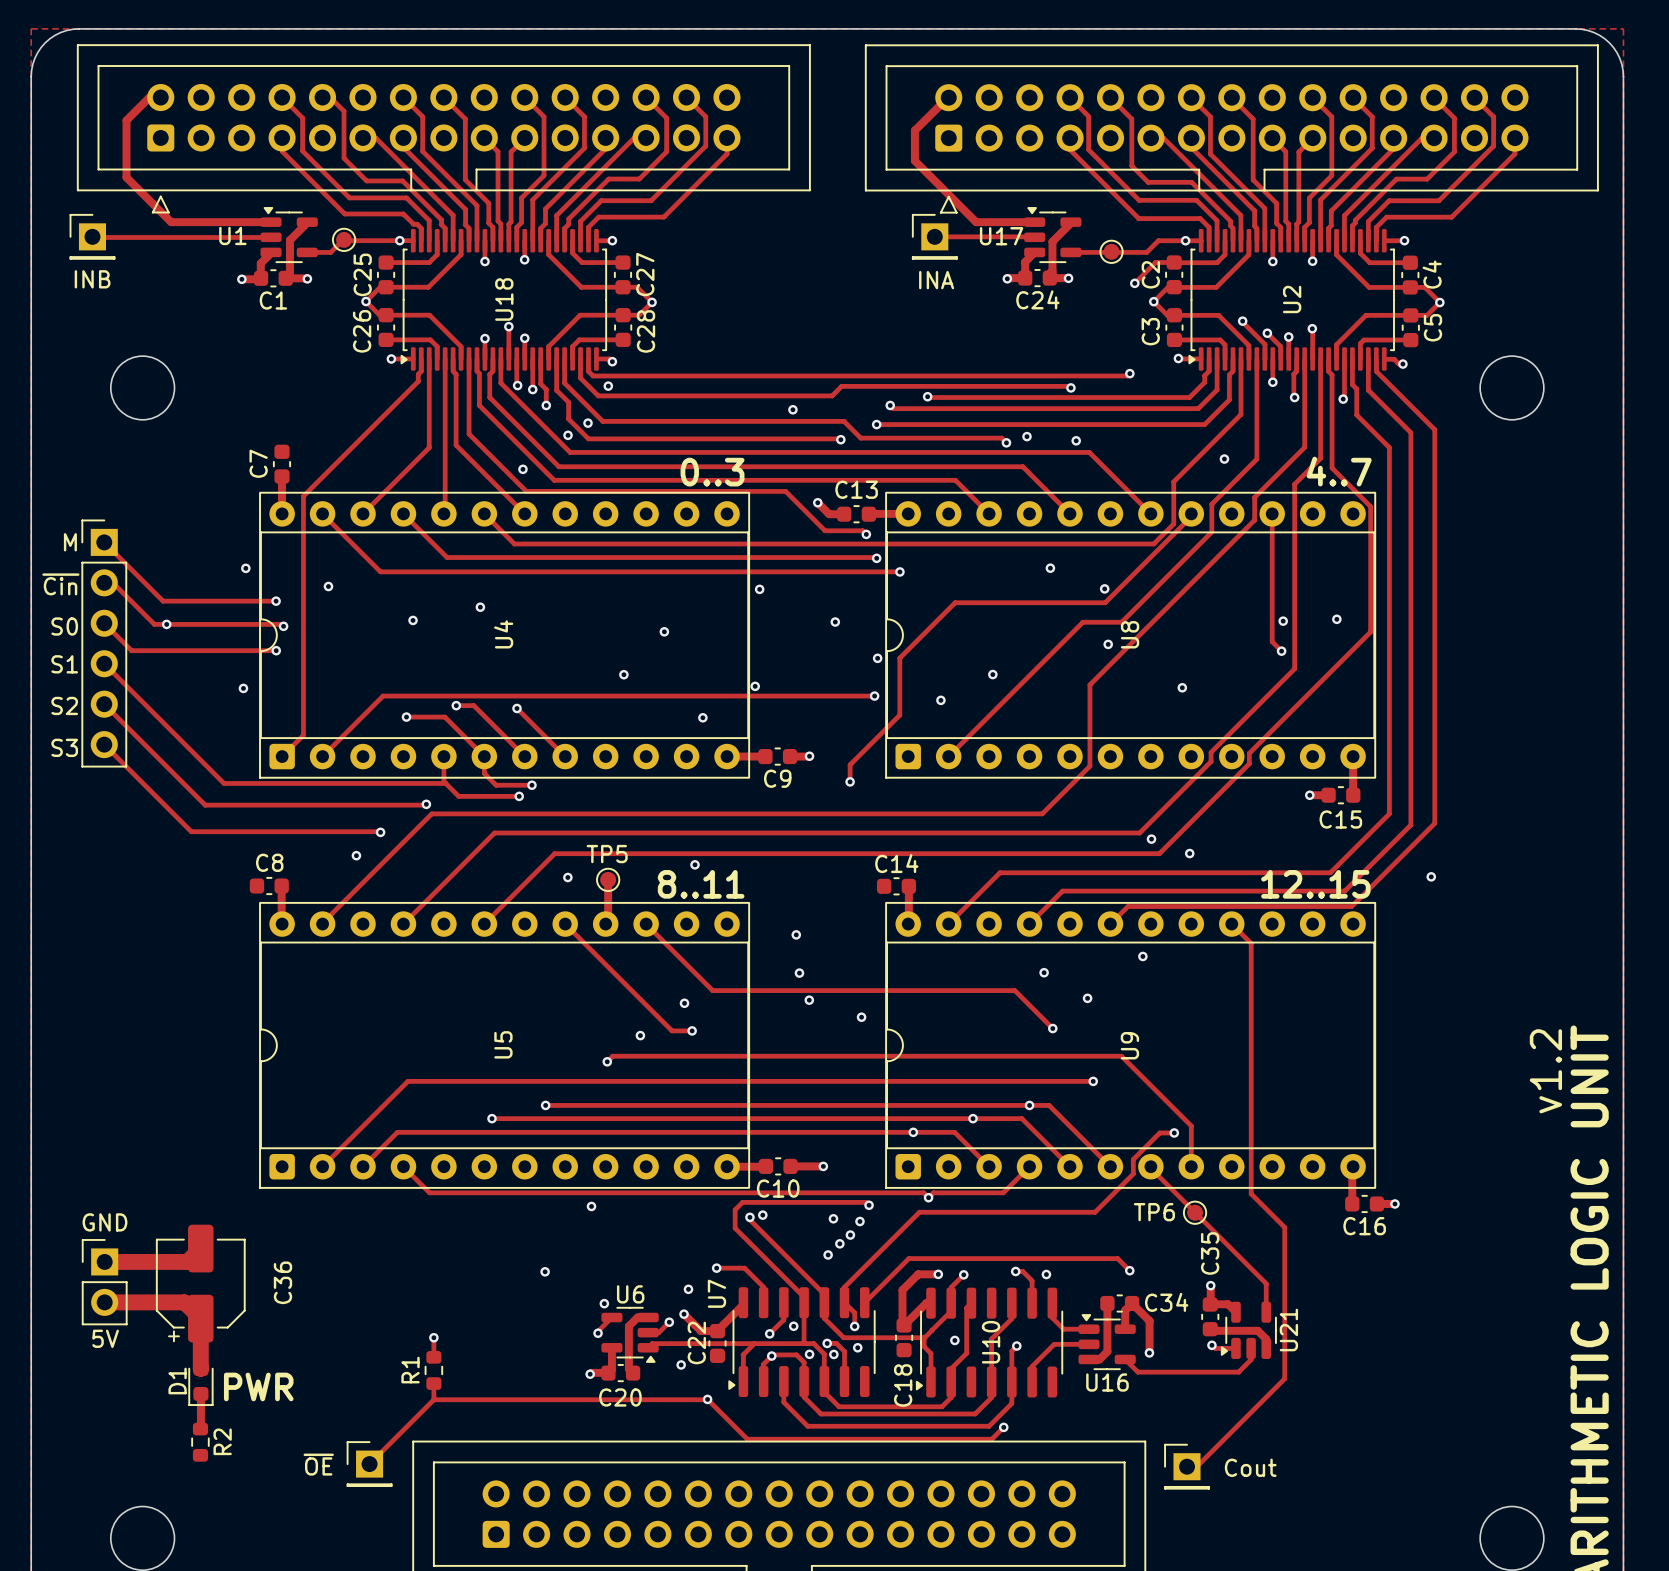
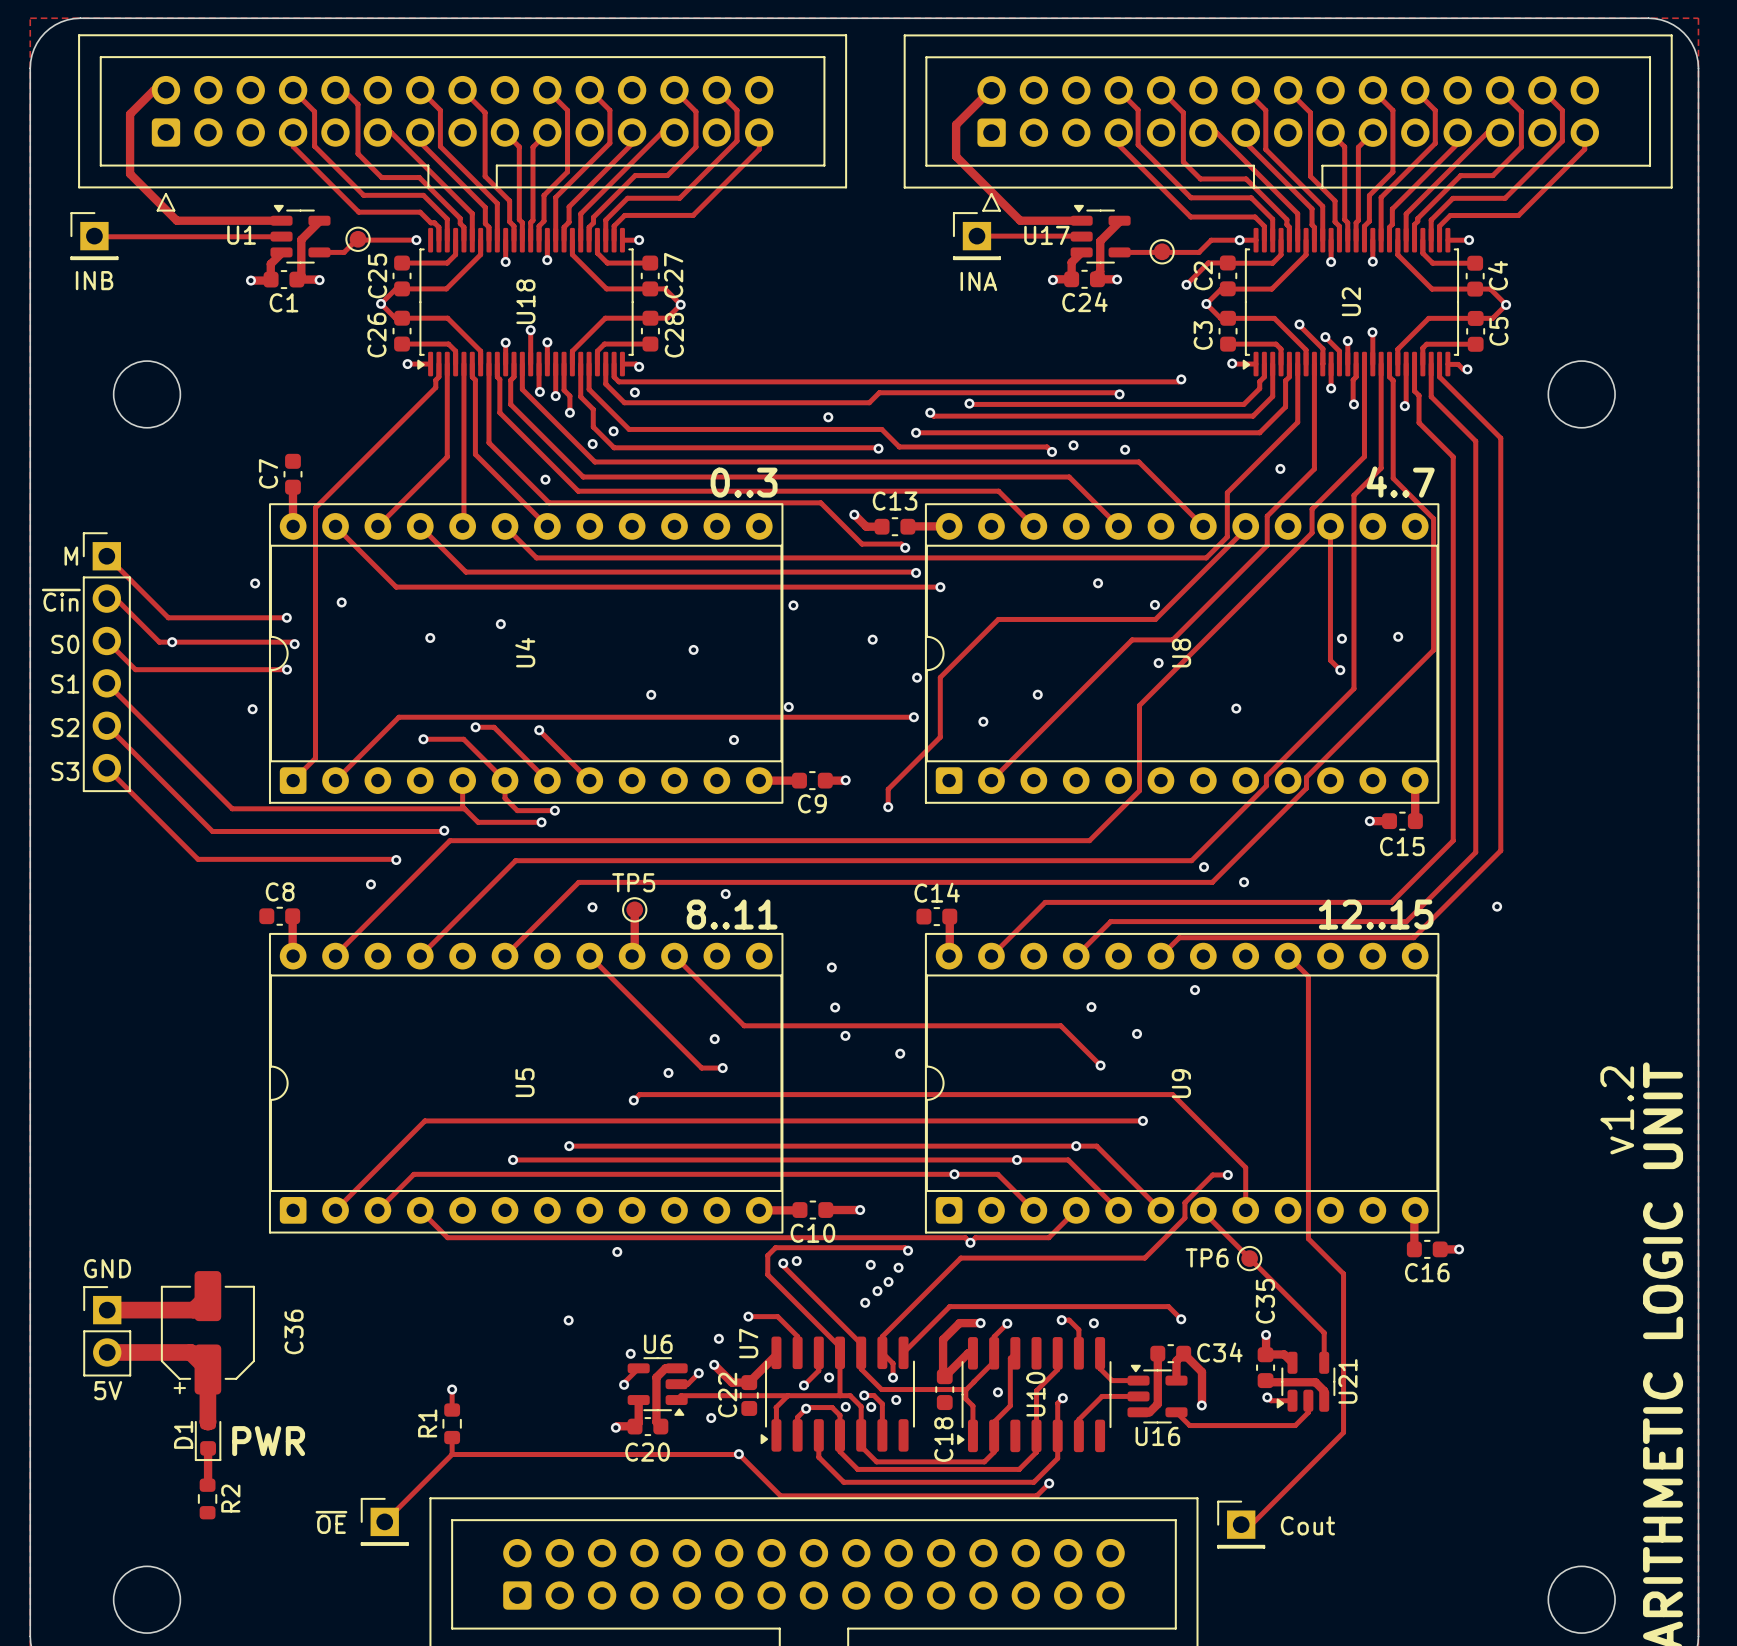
track: (400, 240) (413, 240) -> none

